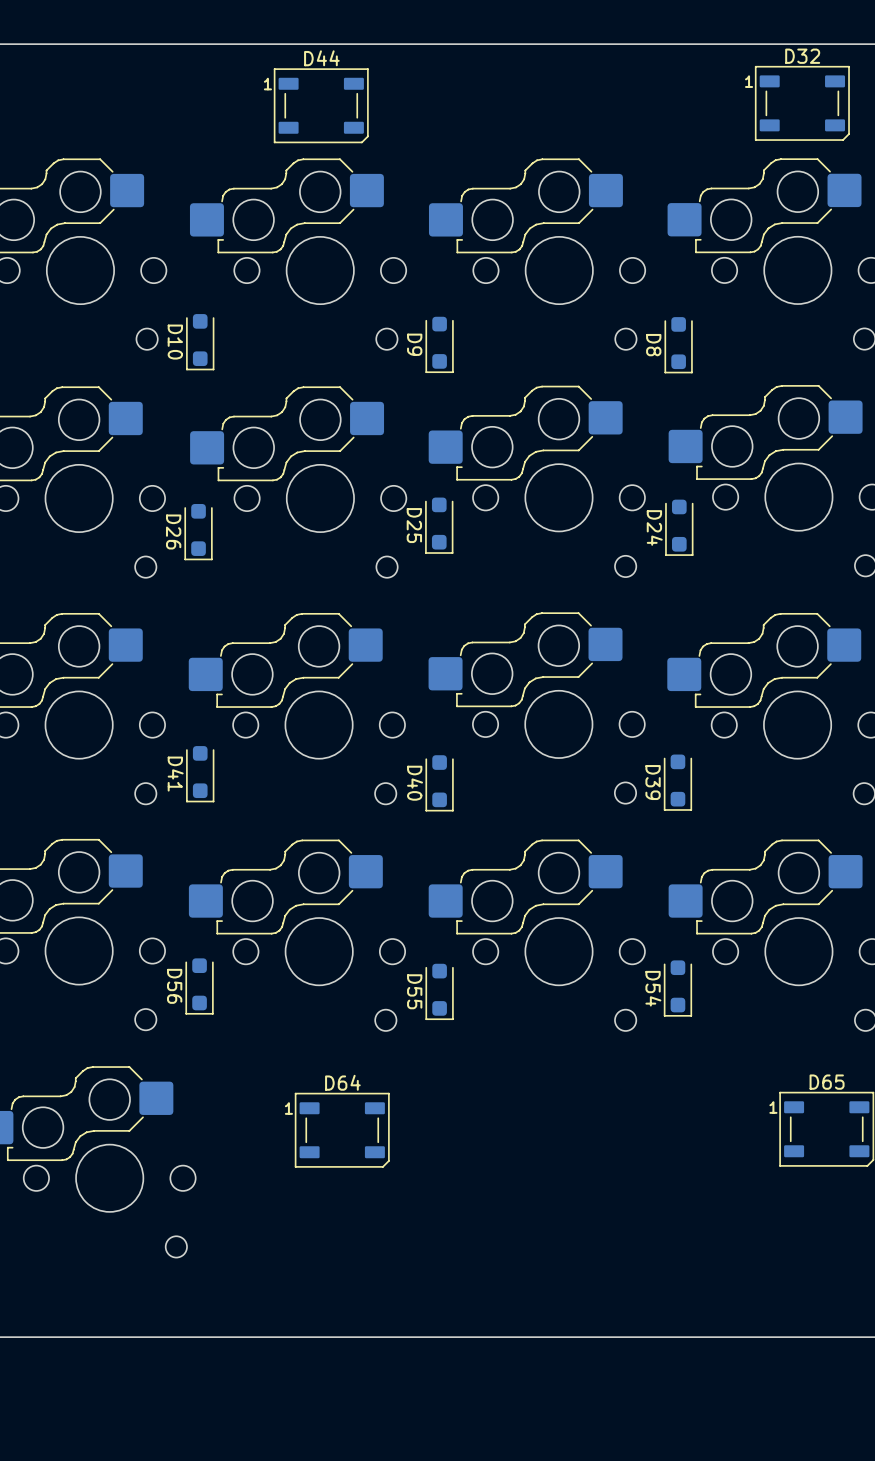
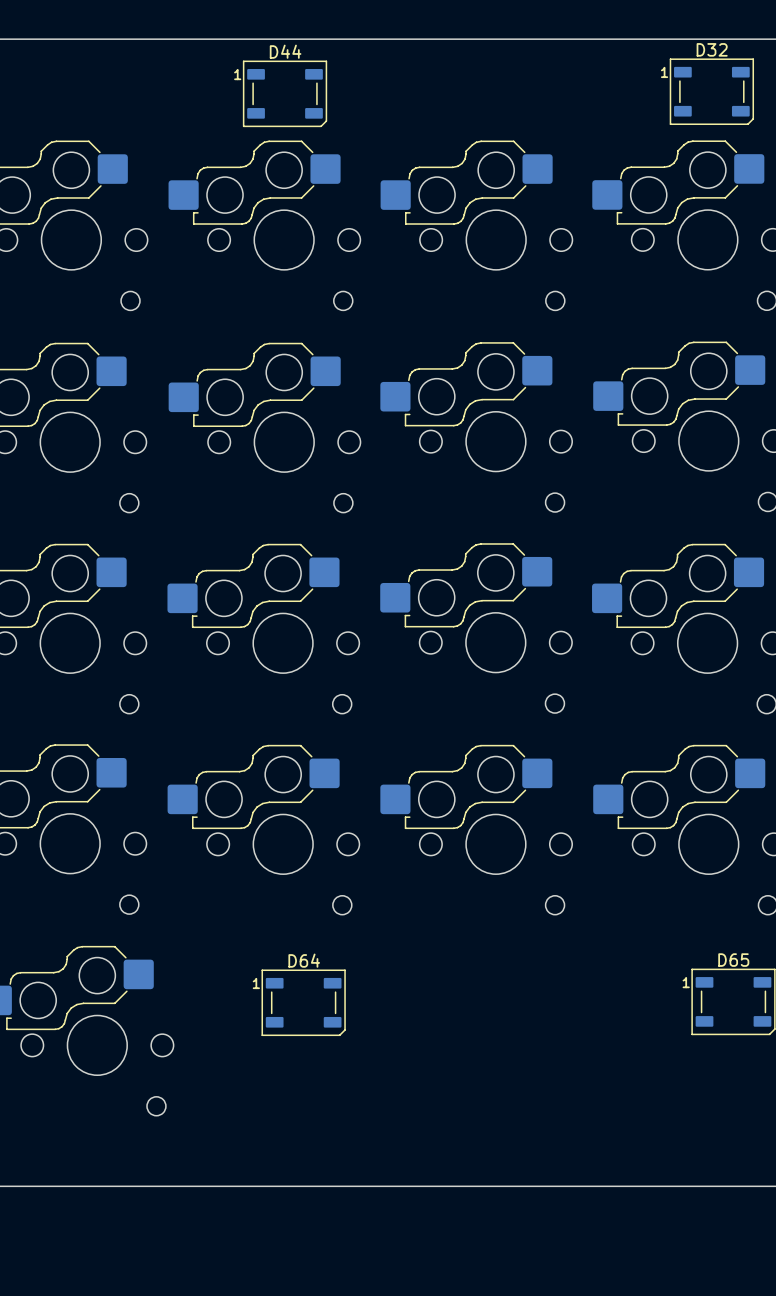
D10: (200, 342) -> none
D9: (439, 344) -> none
D8: (678, 345) -> none
D25: (439, 525) -> none
D24: (679, 527) -> none
D26: (198, 532) -> none
D41: (200, 774) -> none
D39: (677, 782) -> none
D40: (439, 783) -> none
D56: (199, 986) -> none
D54: (677, 988) -> none
D55: (439, 991) -> none

